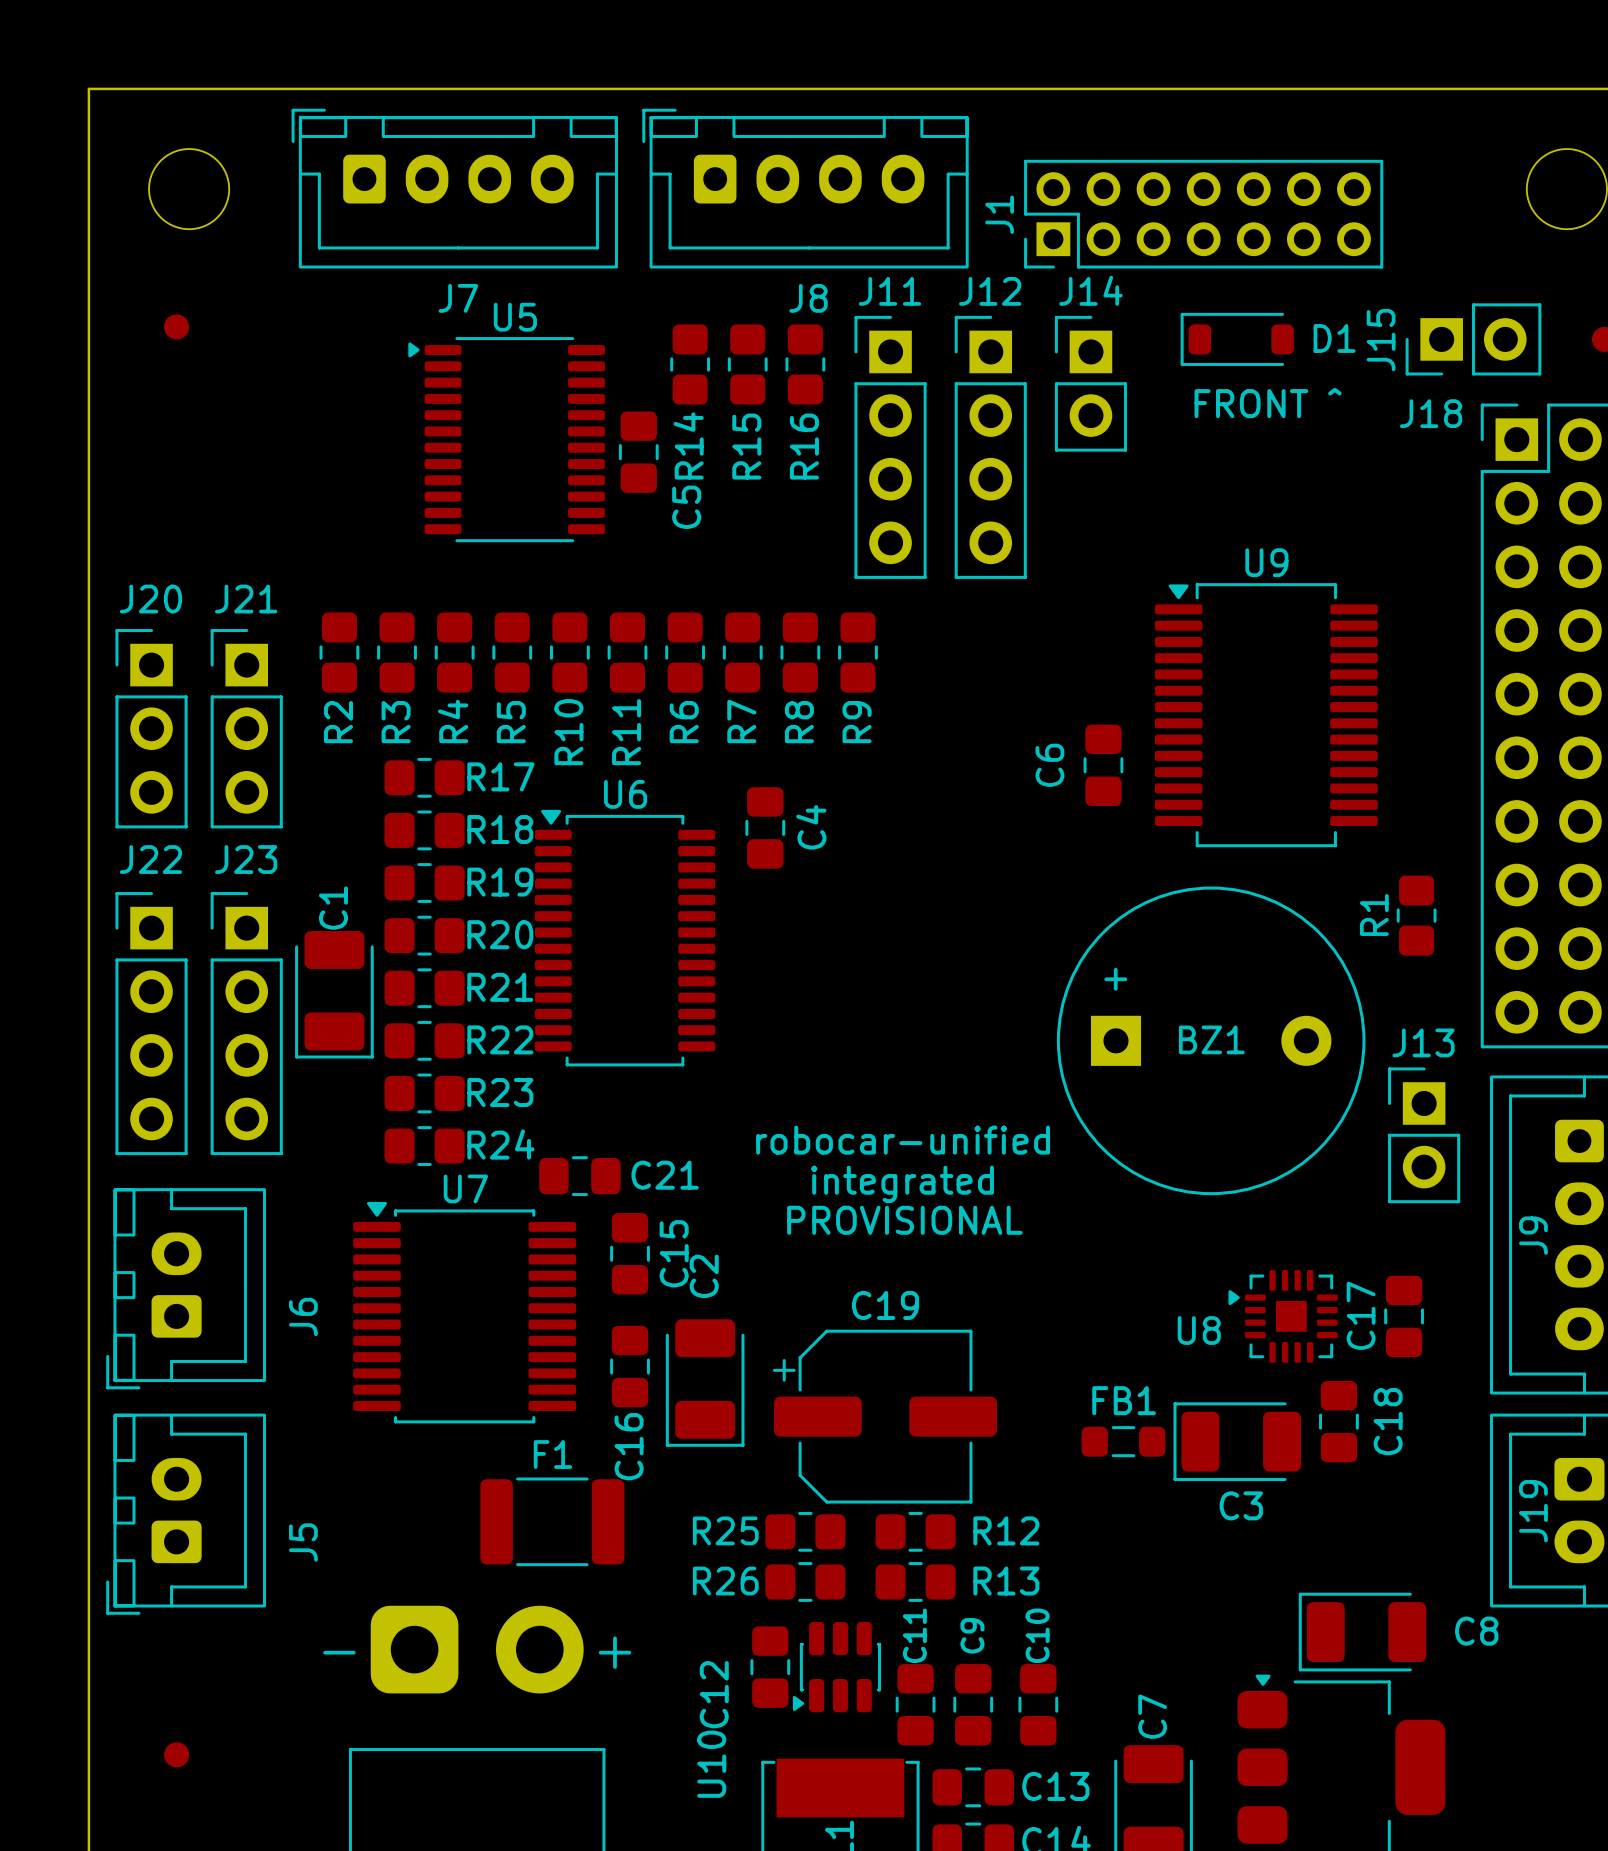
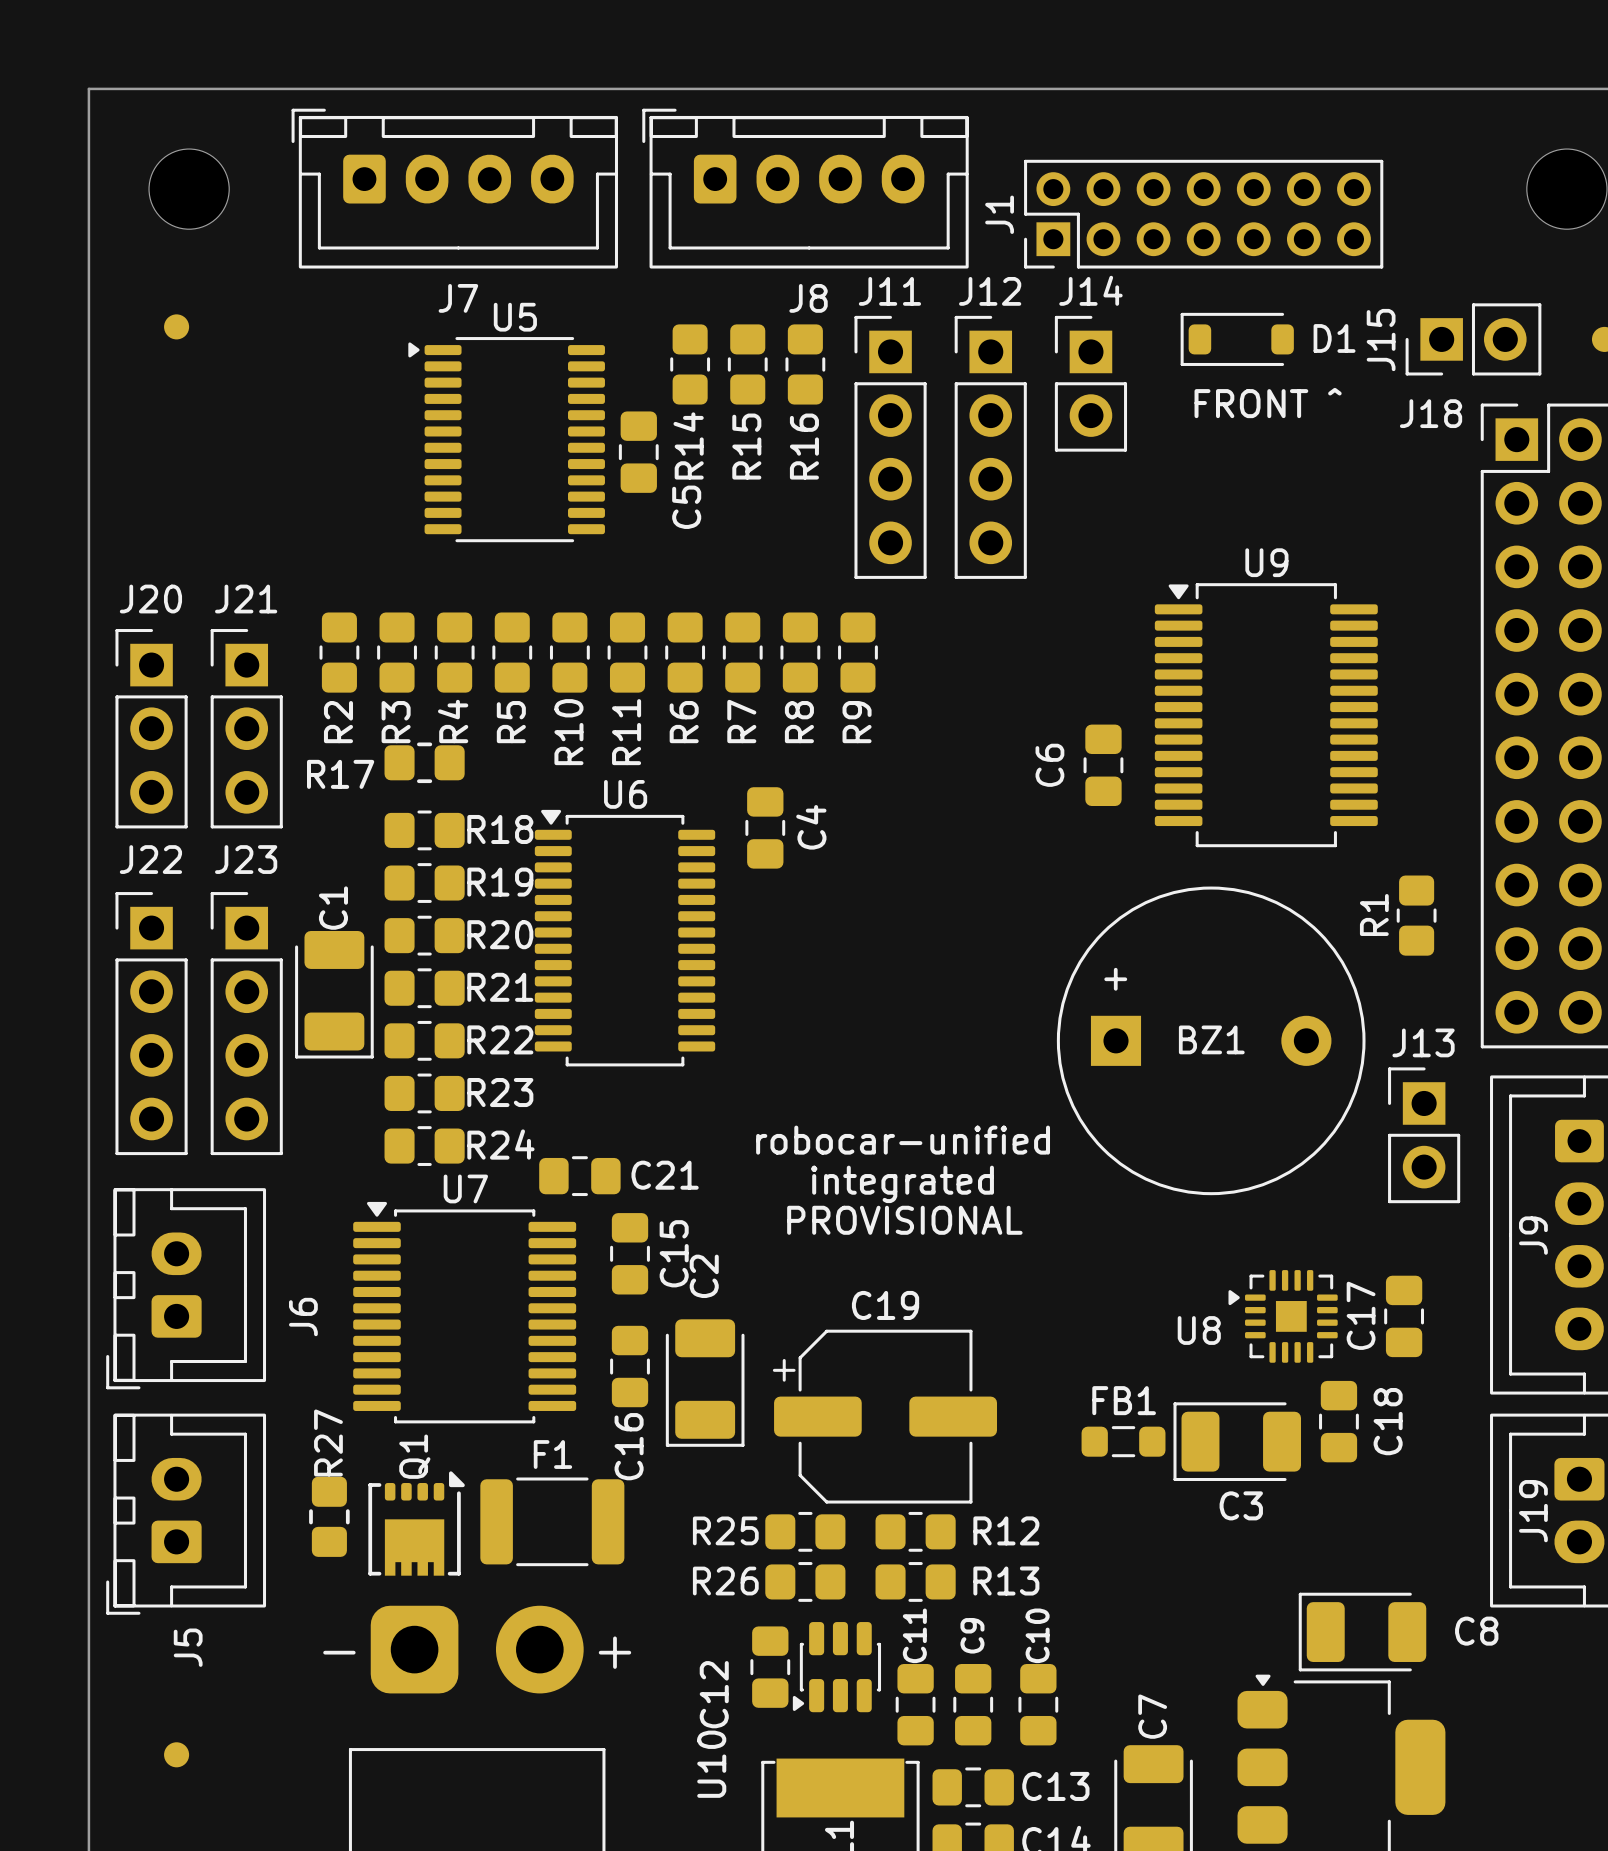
R17 footprint: [384, 757, 465, 798] -> [384, 742, 465, 784]
R17 name position: R17 (500, 776) -> R17 (340, 774)
R27: none -> (329, 1516)
Q1: none -> (416, 1523)
J5 name position: J5 (303, 1542) -> J5 (188, 1647)

